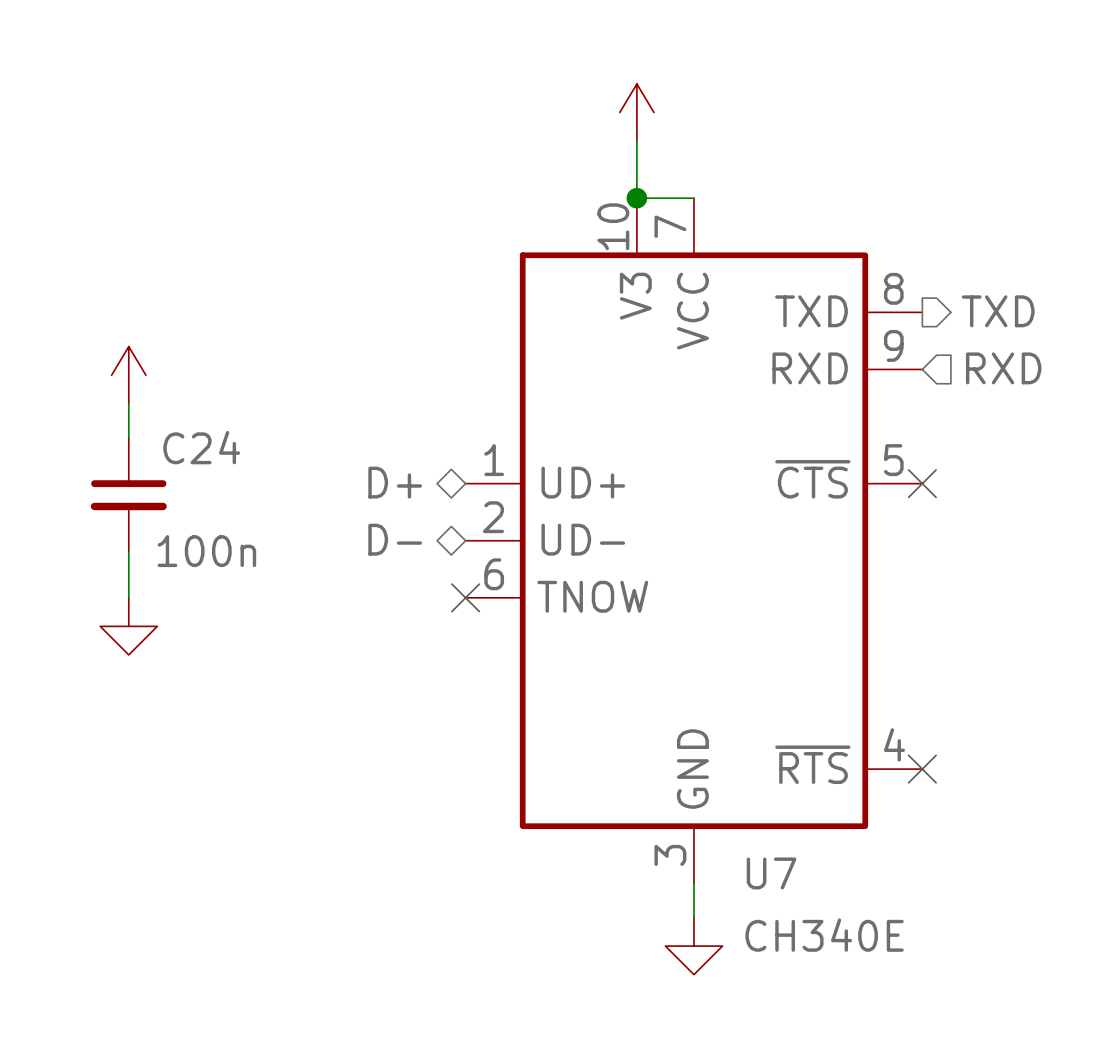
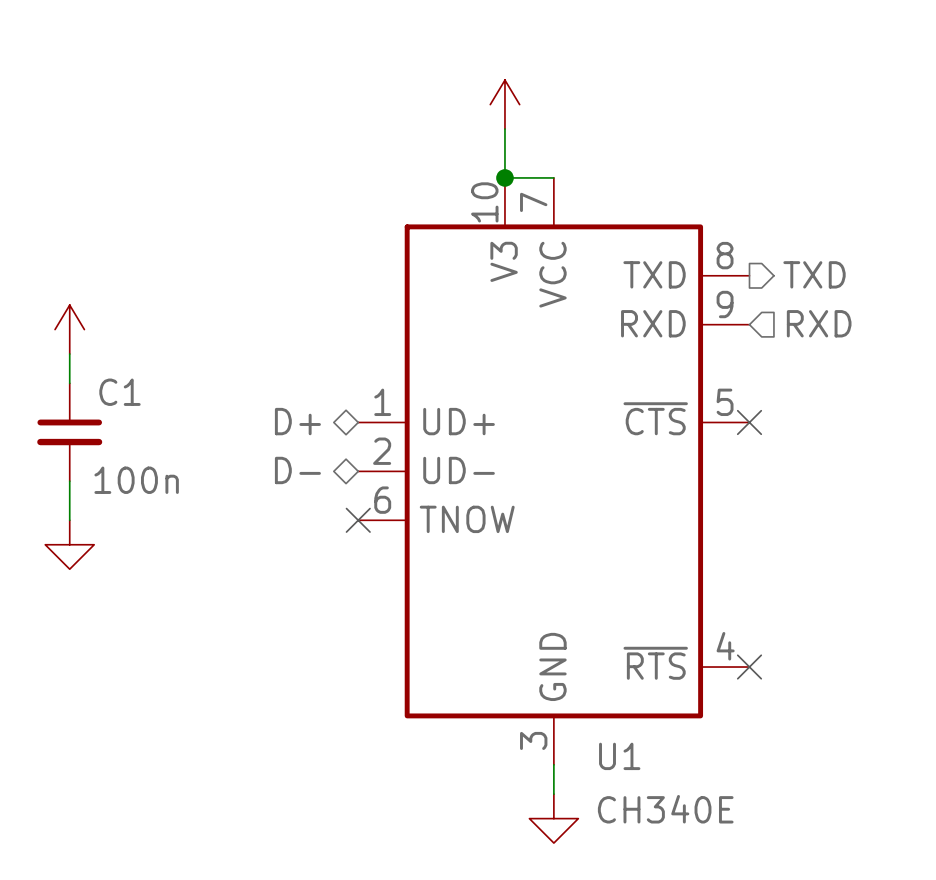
C24 name: C24 (201, 447) -> C1 (119, 392)
U7 name: U7 (771, 873) -> U1 (619, 756)

